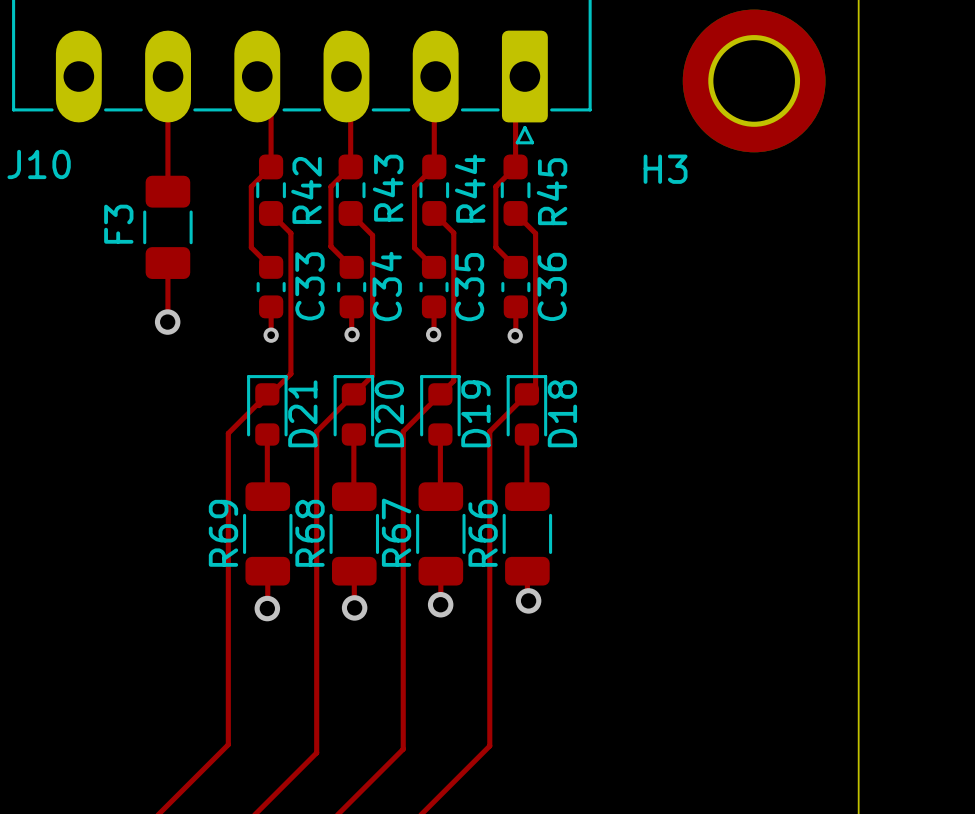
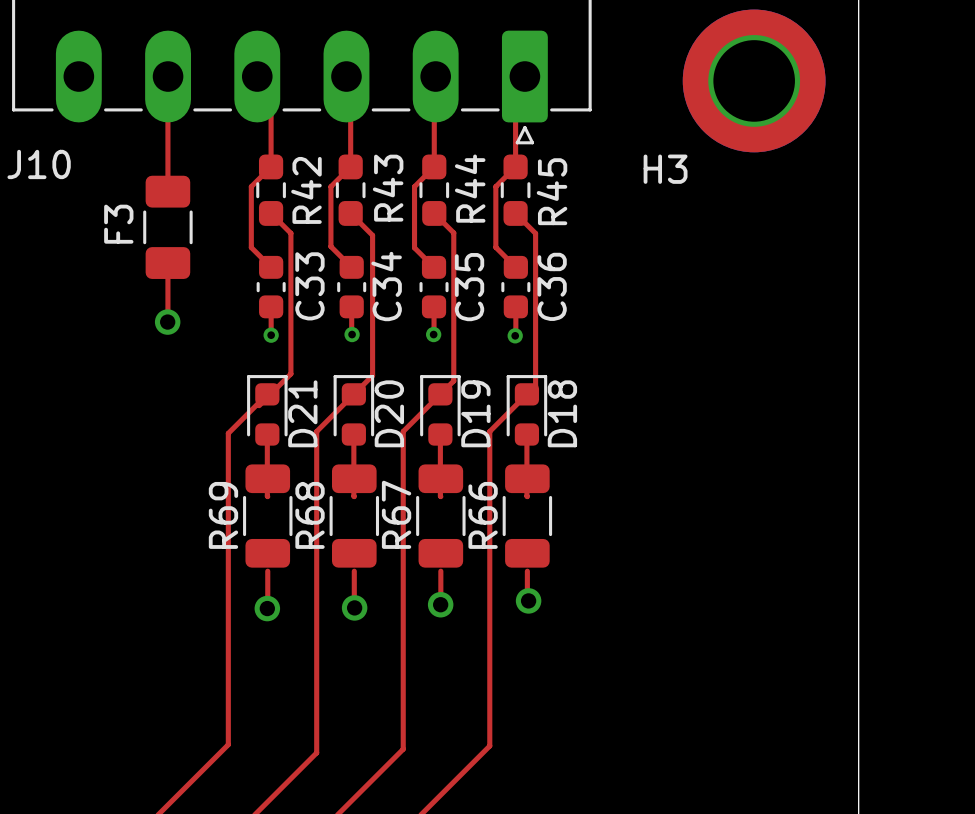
R69 position: (267, 533) -> (267, 516)
R68 position: (354, 533) -> (354, 516)
R67 position: (440, 533) -> (440, 516)
R66 position: (527, 533) -> (527, 516)

